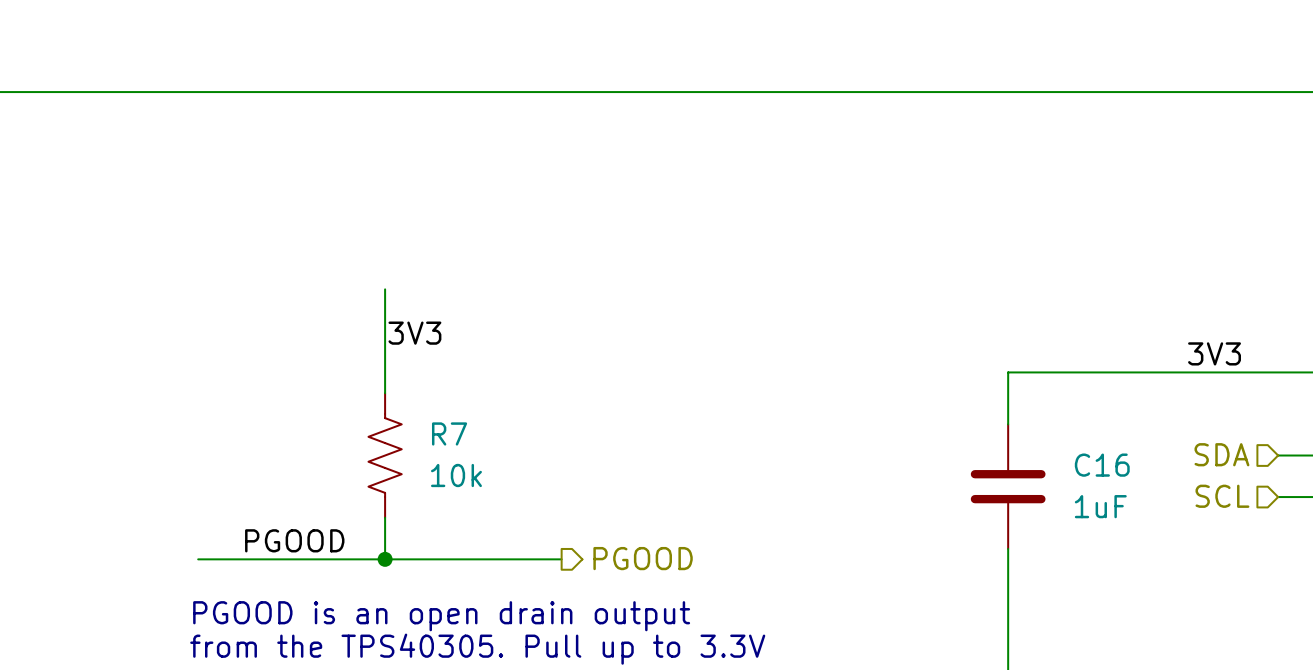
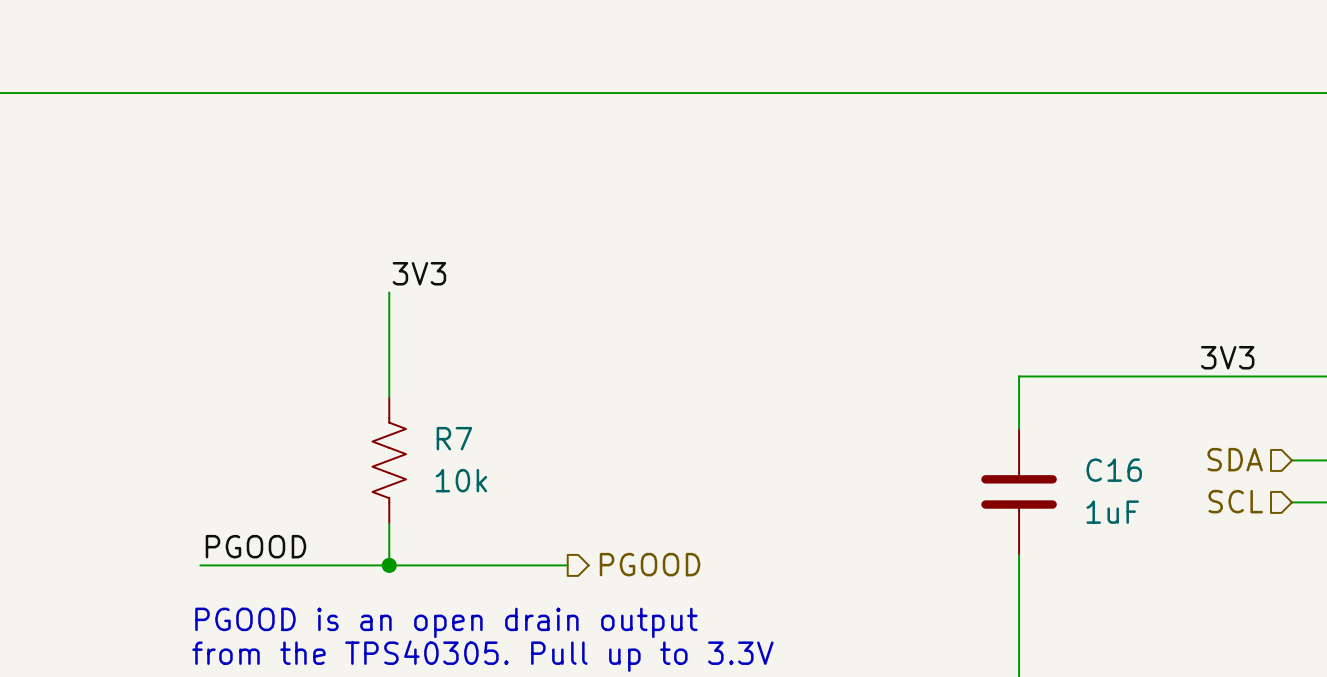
label position: 3V3 (414, 333) -> 3V3 (419, 273)
label position: PGOOD (294, 540) -> PGOOD (255, 546)

